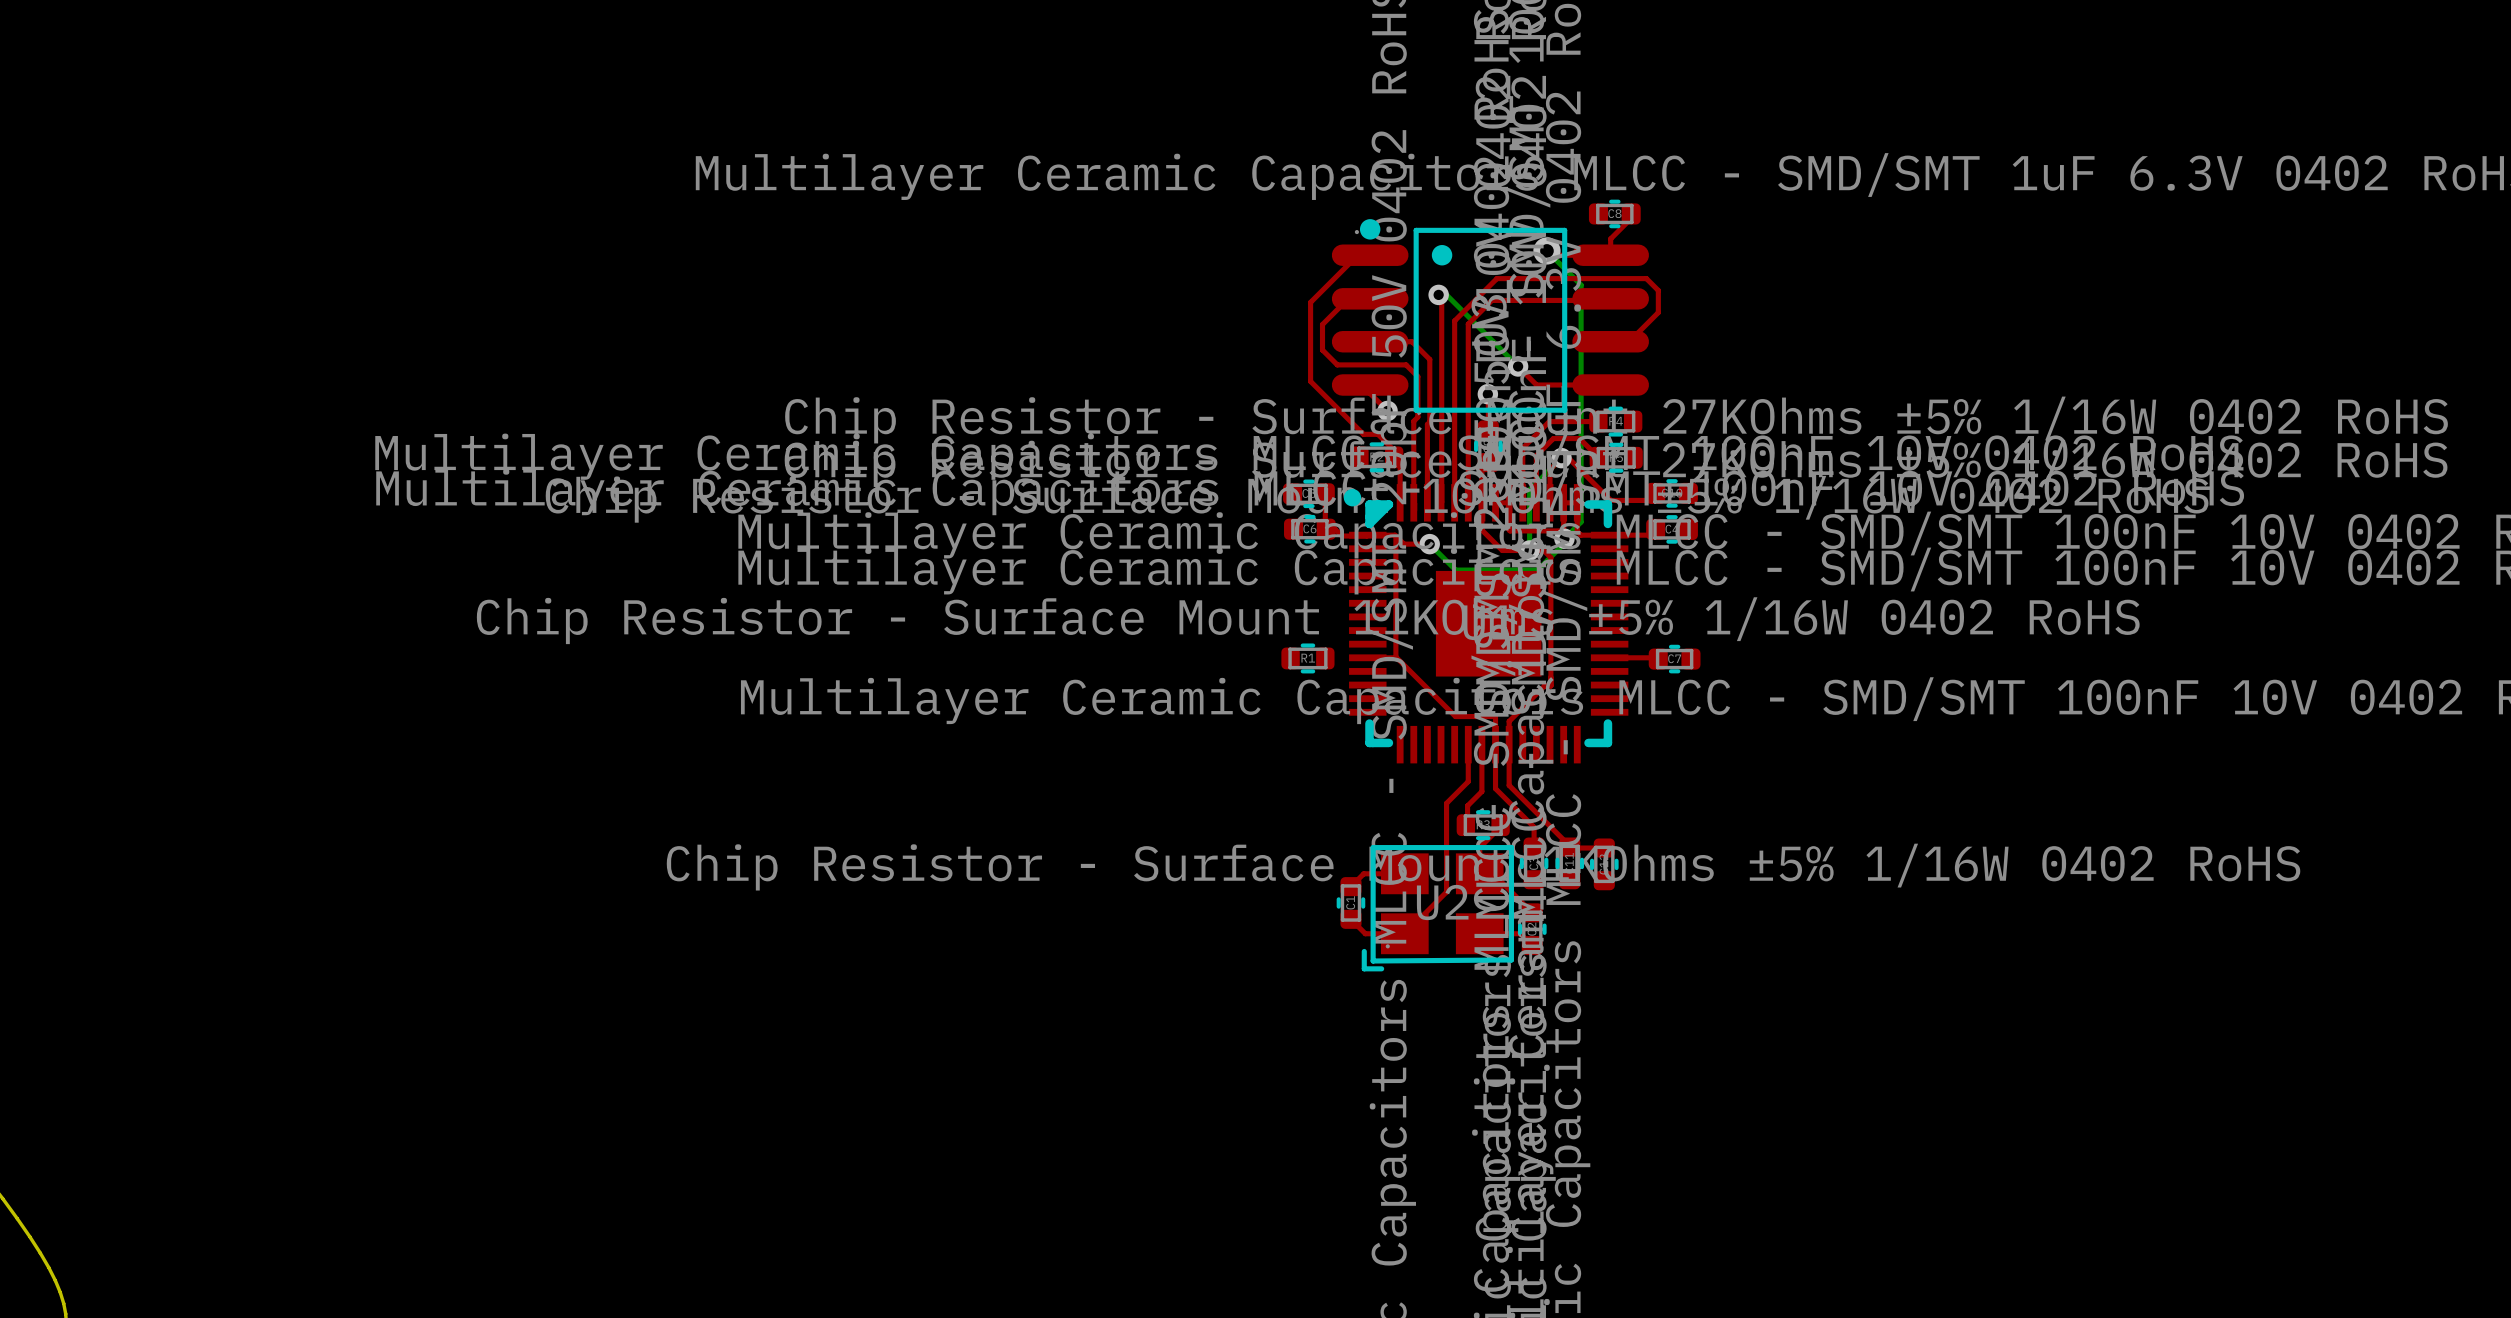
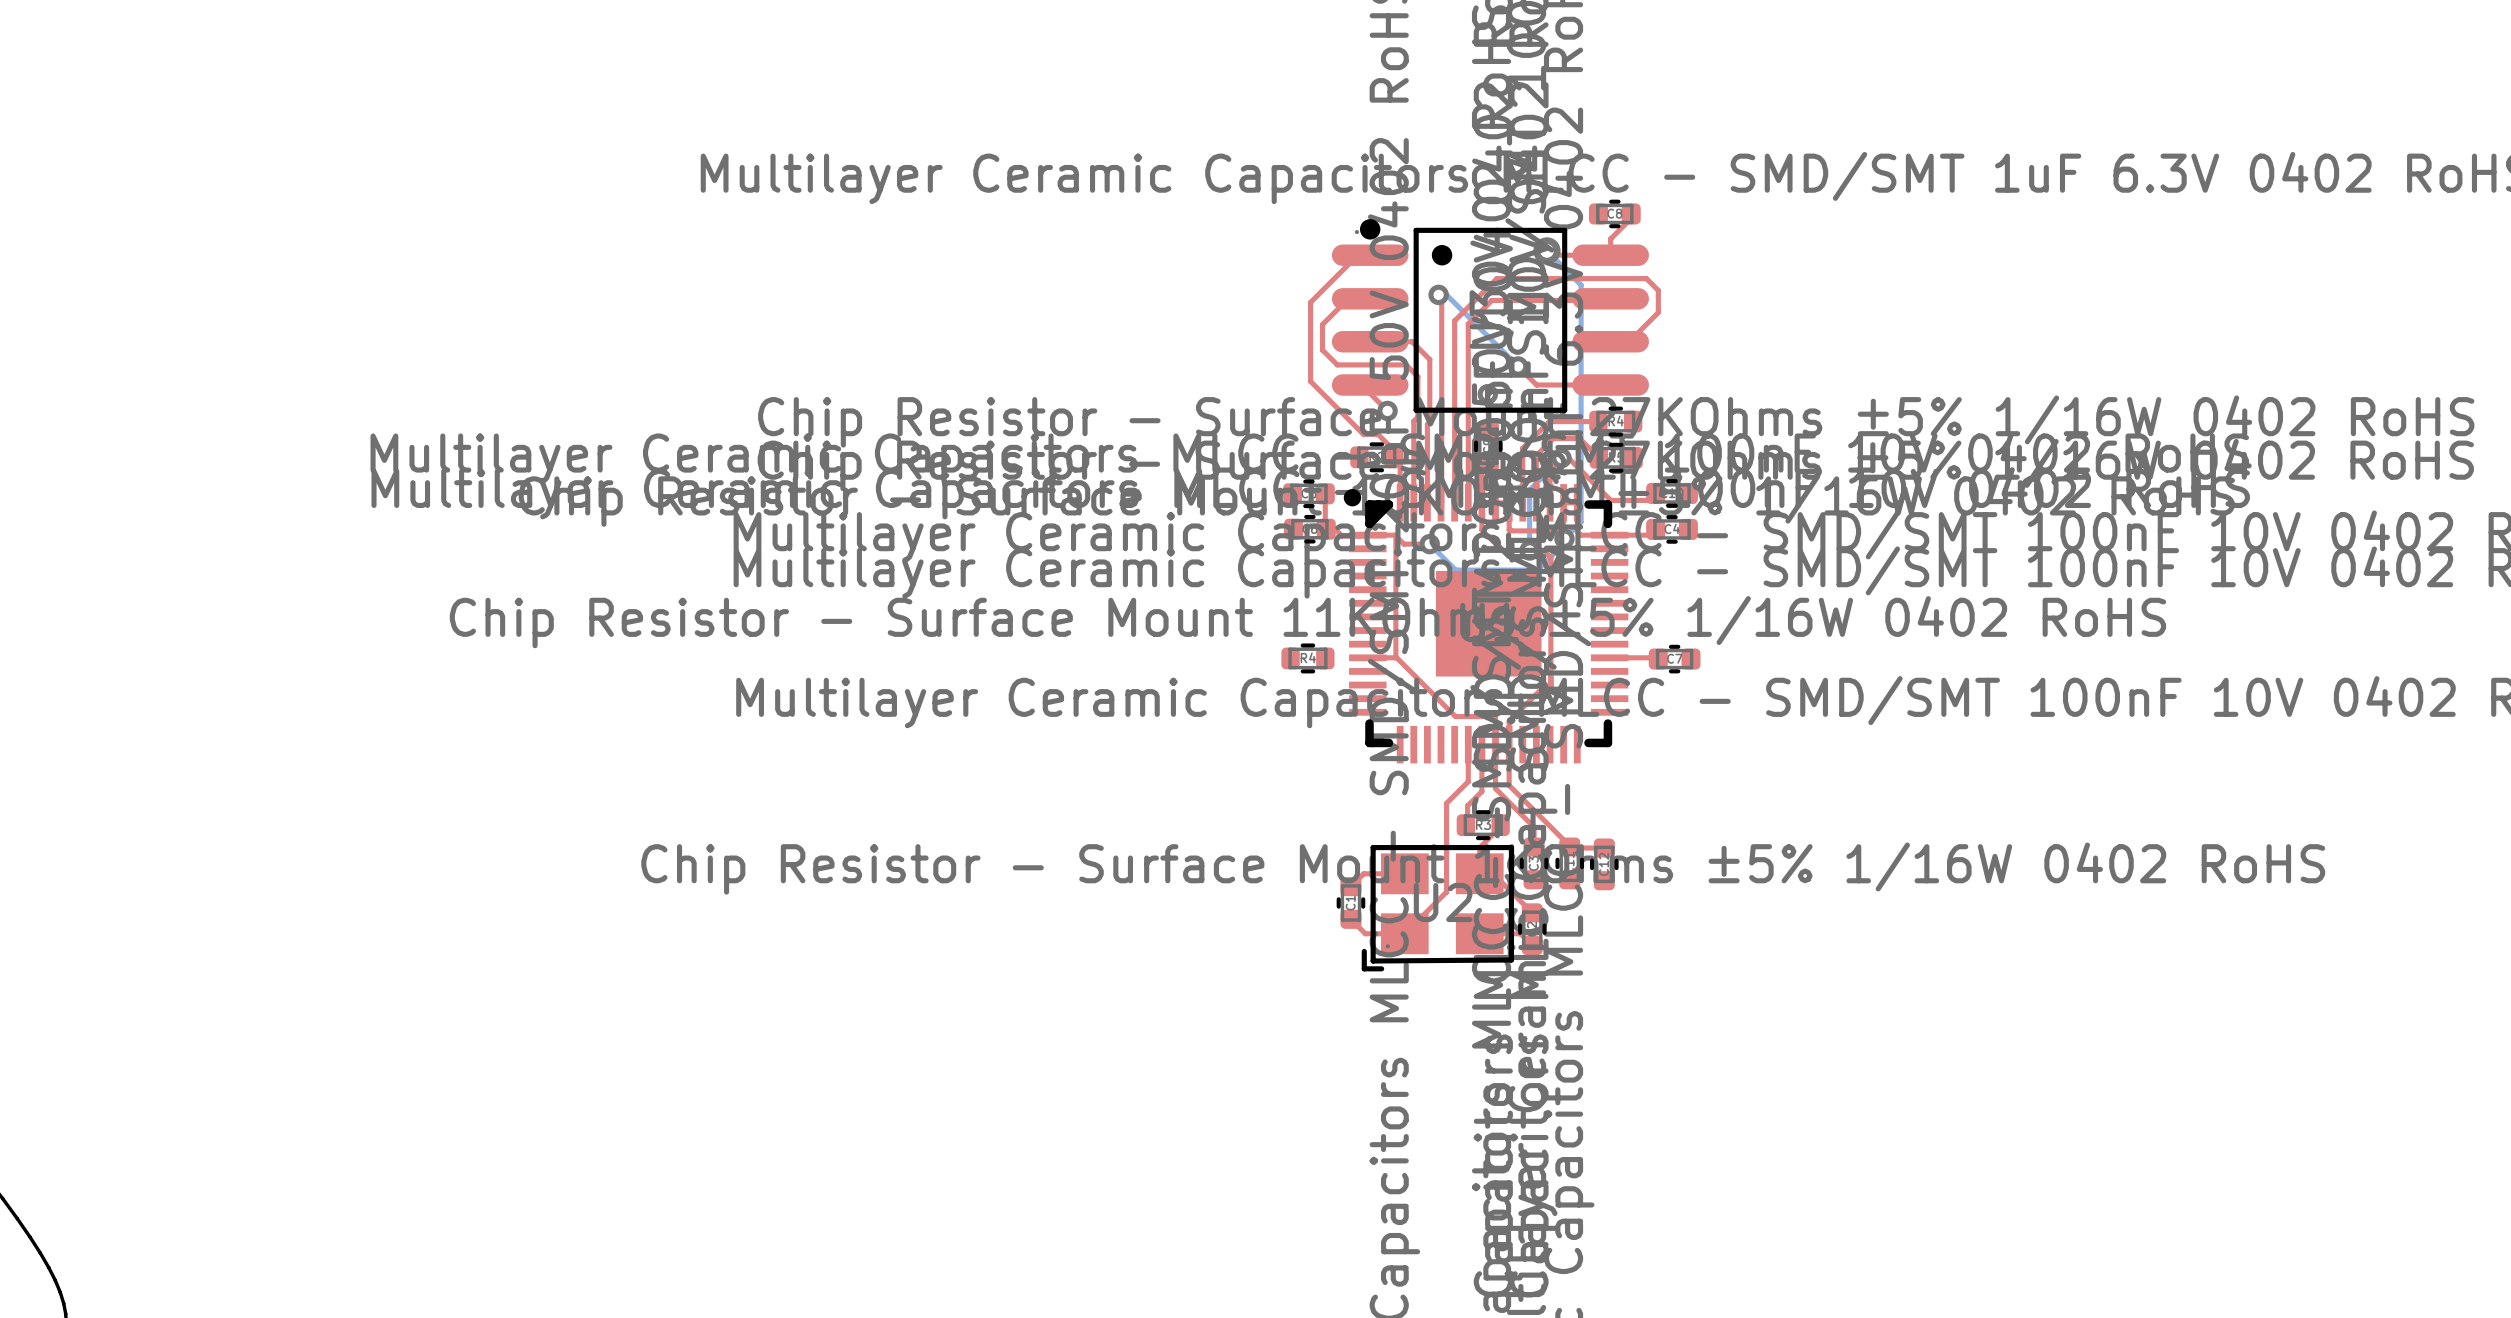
R1 name: R1 (1308, 658) -> R4 (1308, 657)

